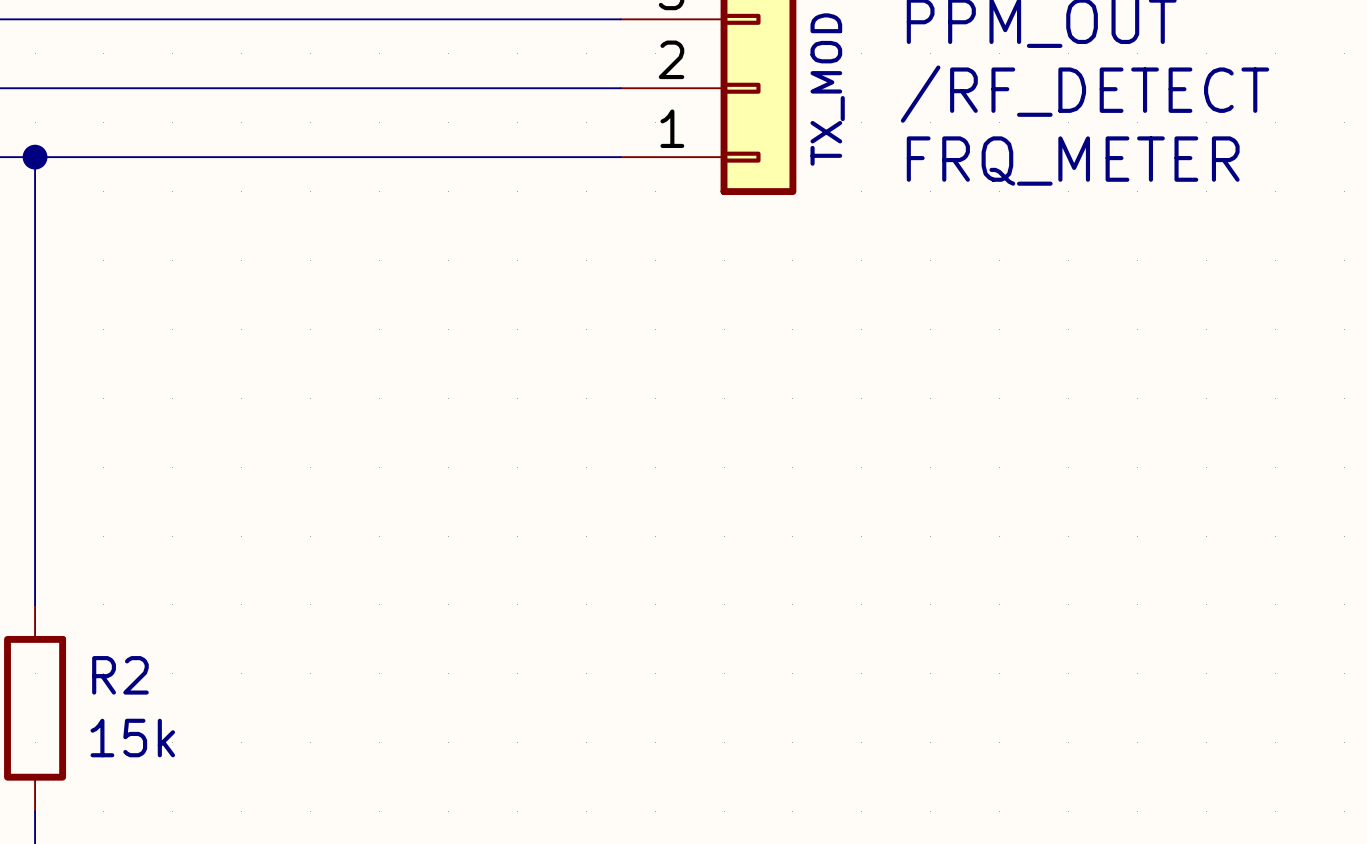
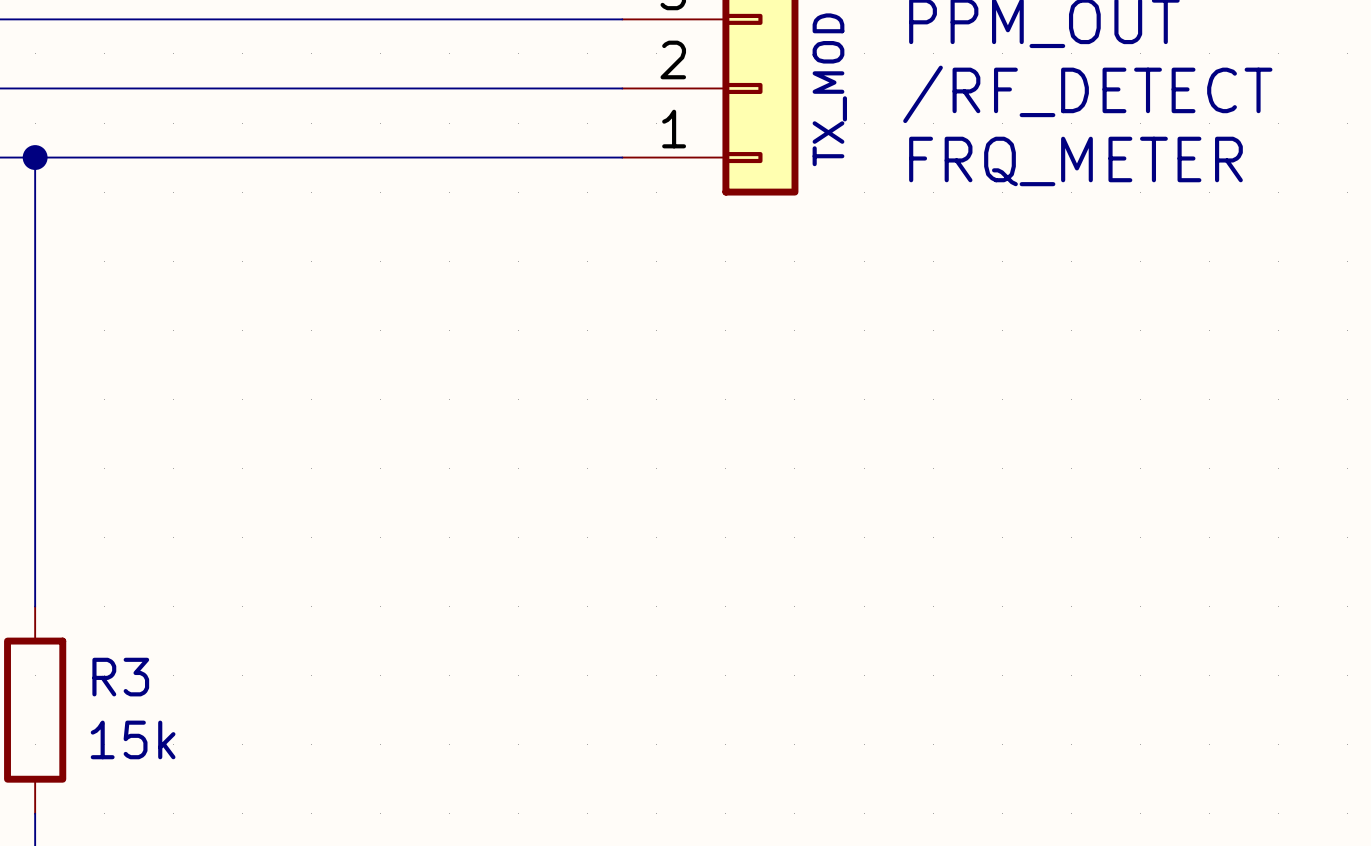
R2 name: R2 (120, 675) -> R3 (120, 677)

